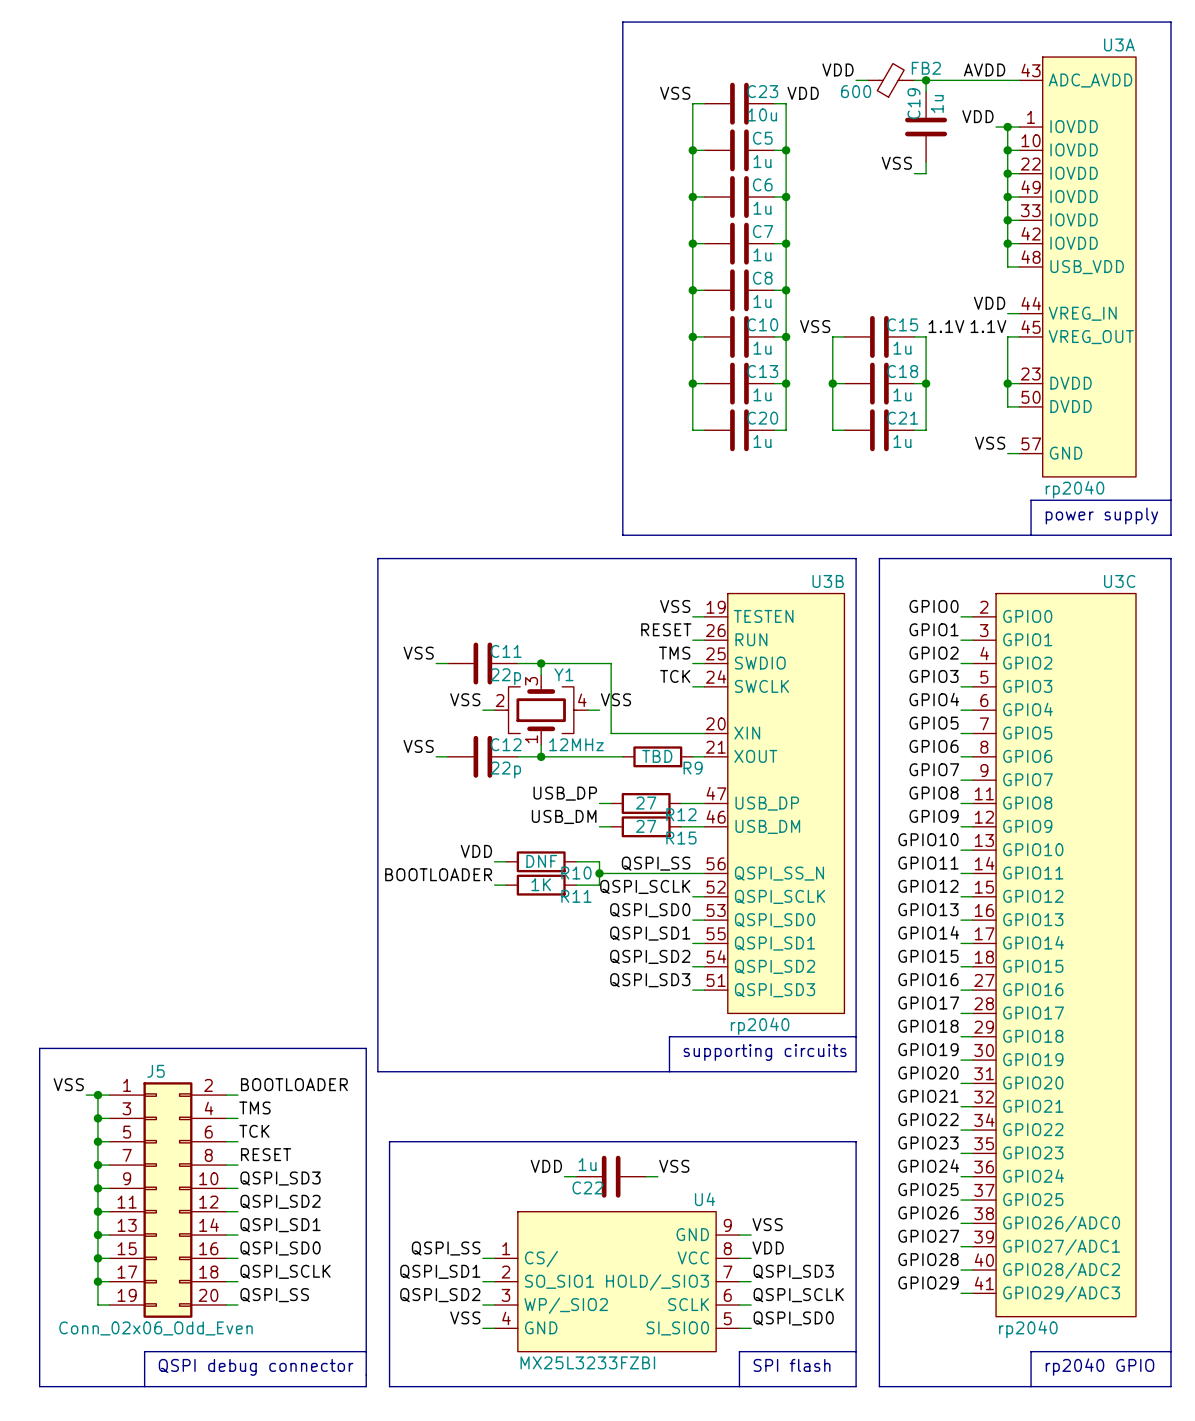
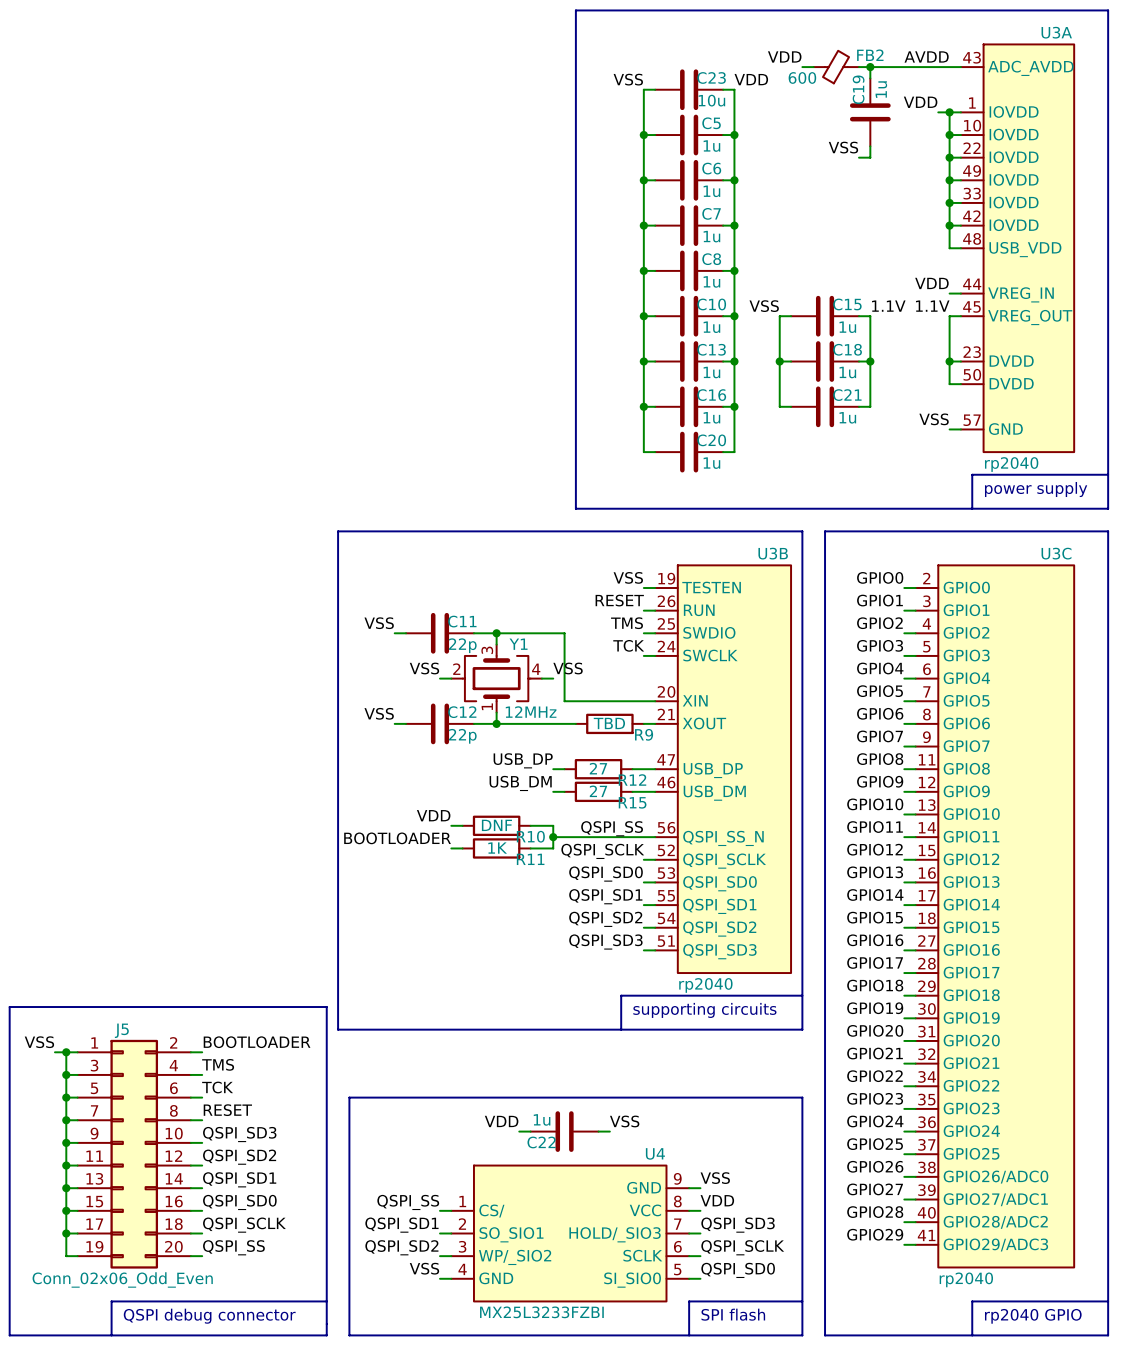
C20 name: C20 (762, 418) -> C16 (711, 395)
wire: none -> (643, 406) (643, 452) (655, 452)
junction: none -> (643, 406)
wire: none -> (734, 406) (734, 452) (723, 452)
junction: none -> (734, 406)
C20: none -> 1u (689, 452)

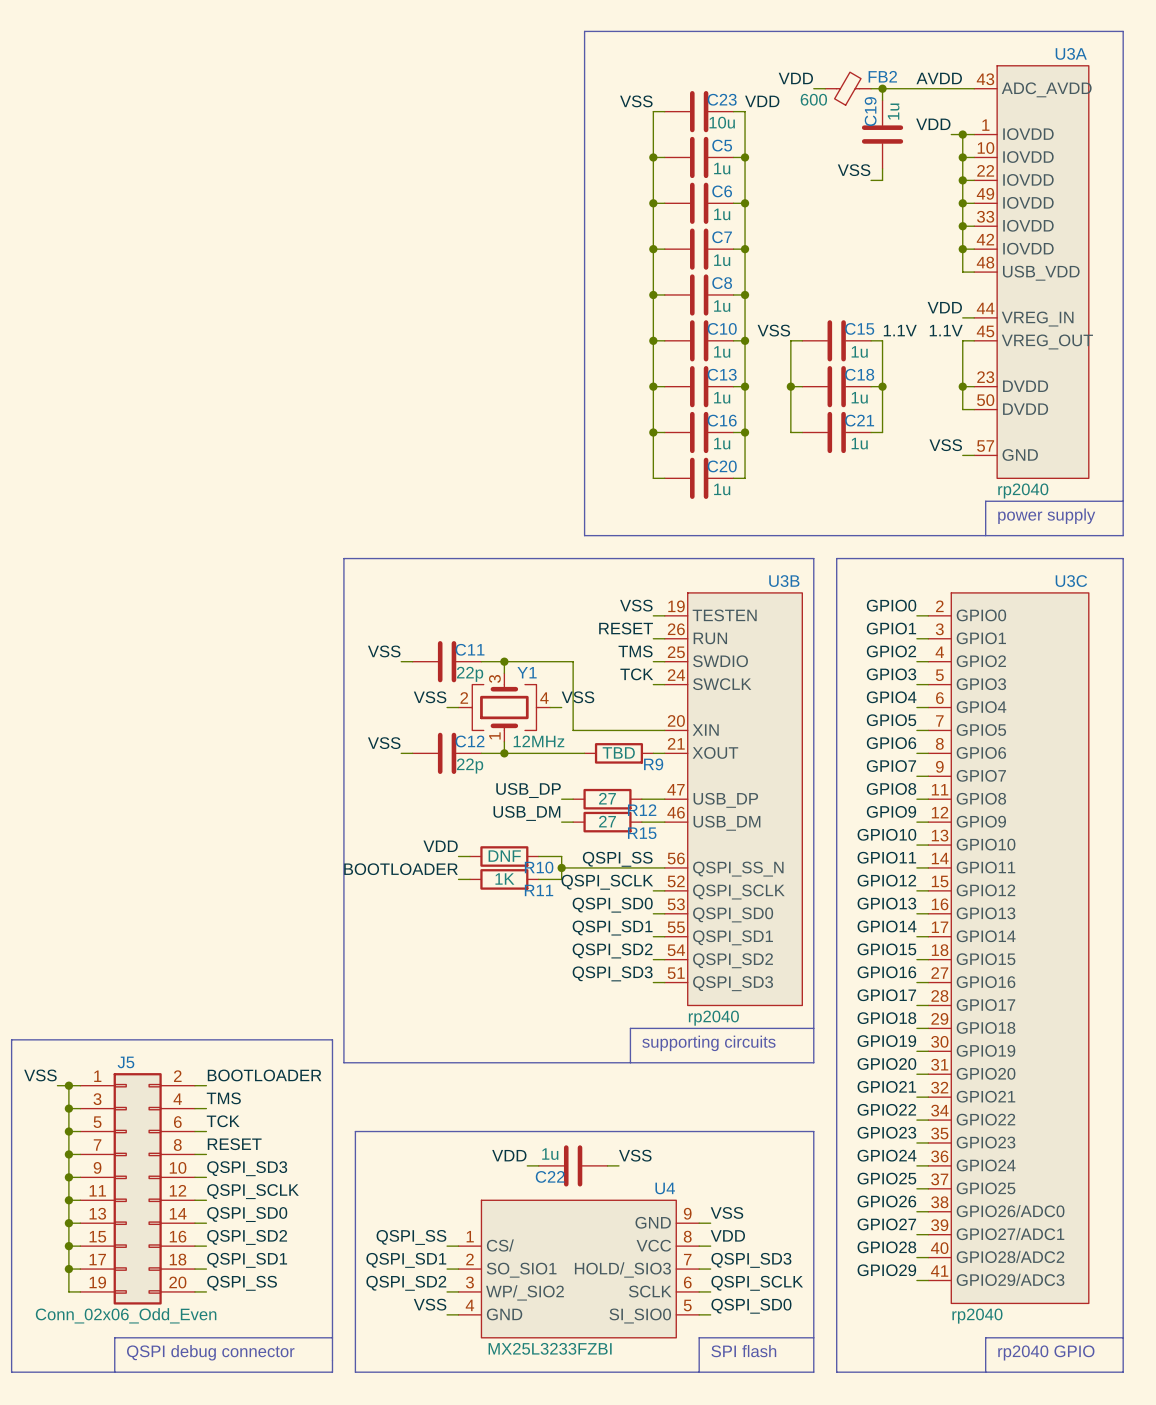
label: QSPI_SD2 (239, 1157) -> QSPI_SCLK (253, 1191)
label: QSPI_SD1 (239, 1179) -> QSPI_SD0 (247, 1214)
label: QSPI_SD0 (239, 1202) -> QSPI_SD2 (247, 1237)
label: QSPI_SCLK (244, 1225) -> QSPI_SD1 (247, 1260)

